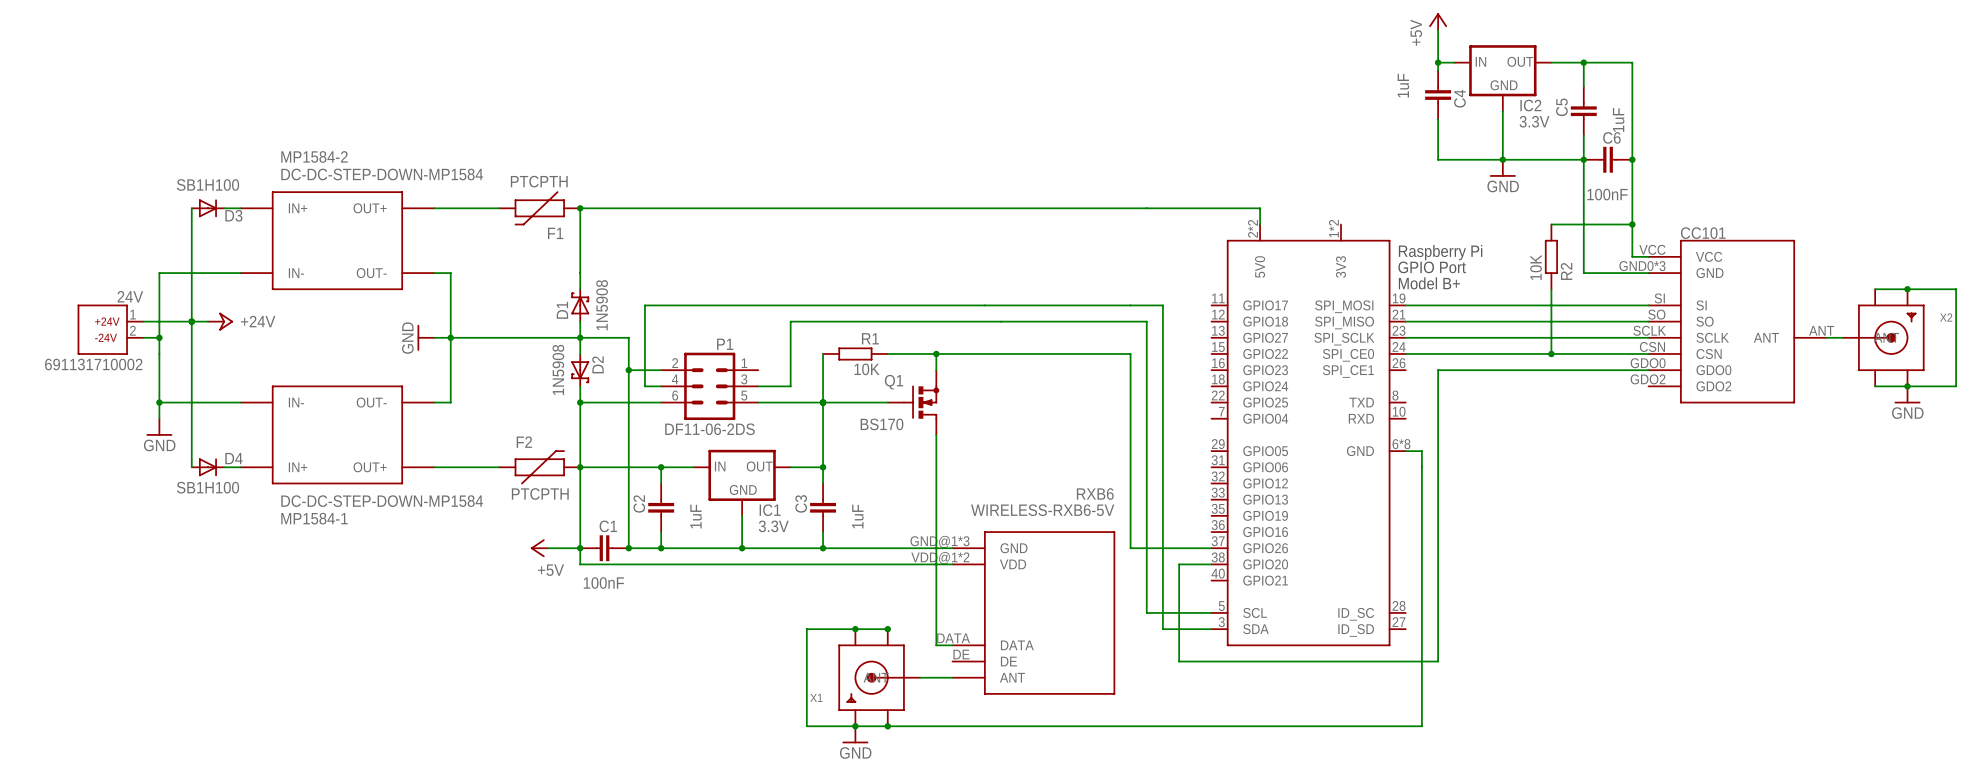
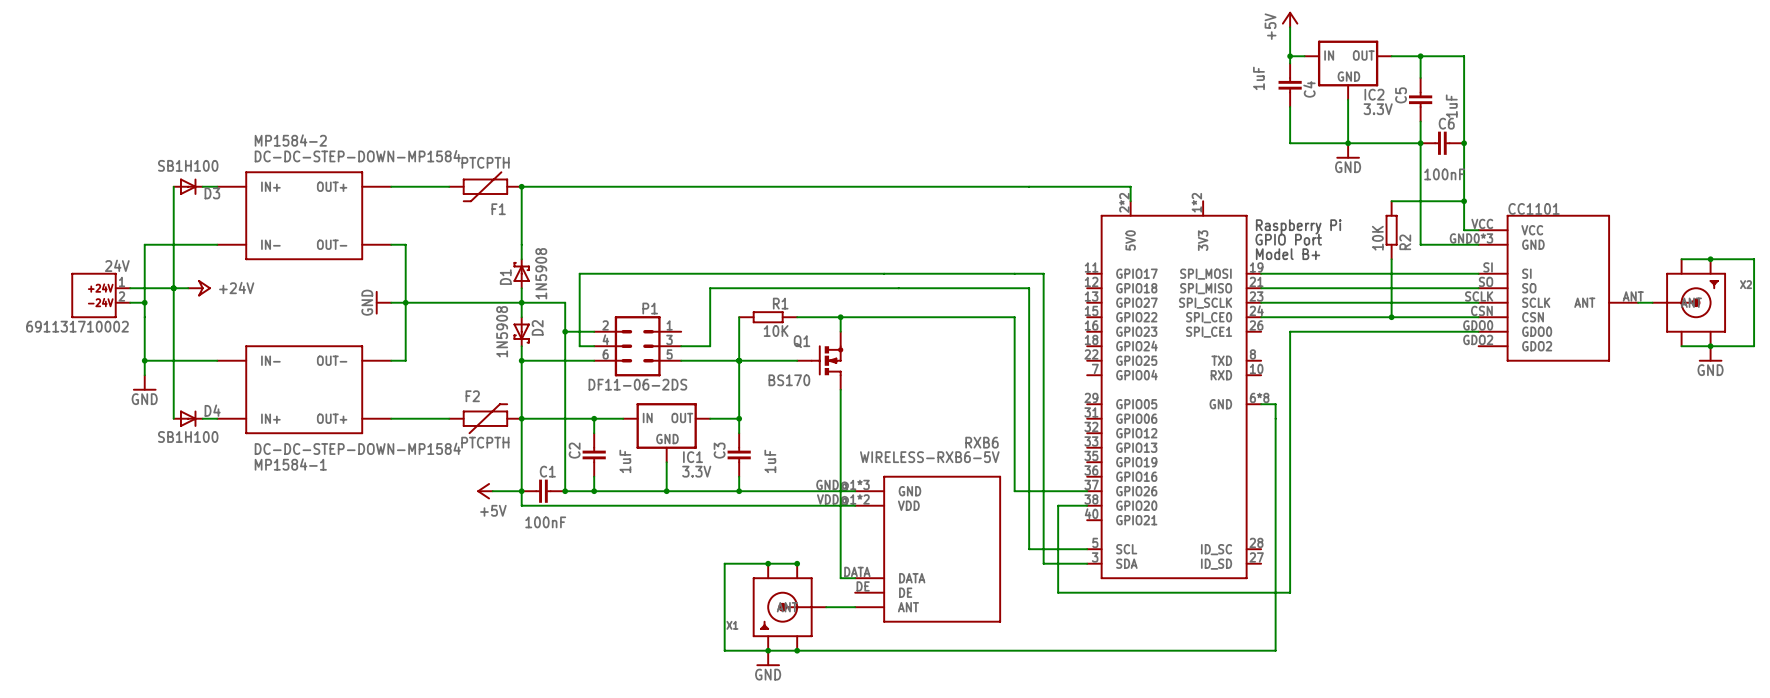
CC101 name: CC101 (1703, 233) -> CC1101 (1534, 208)

